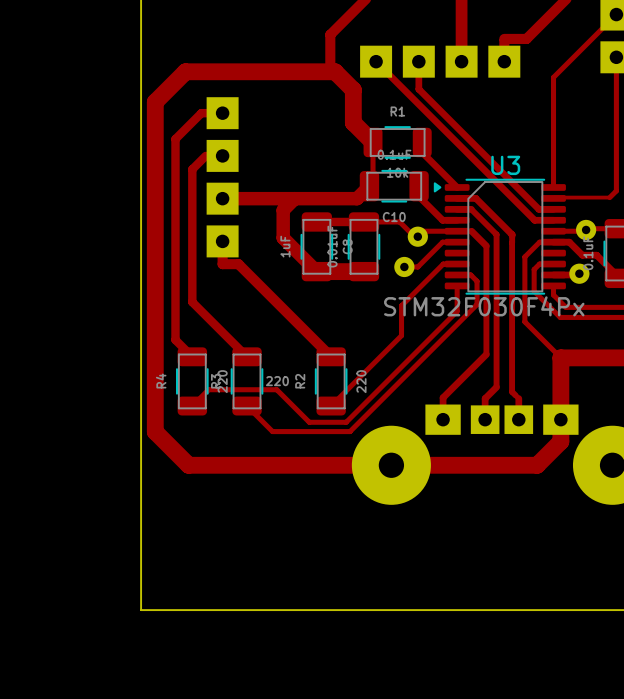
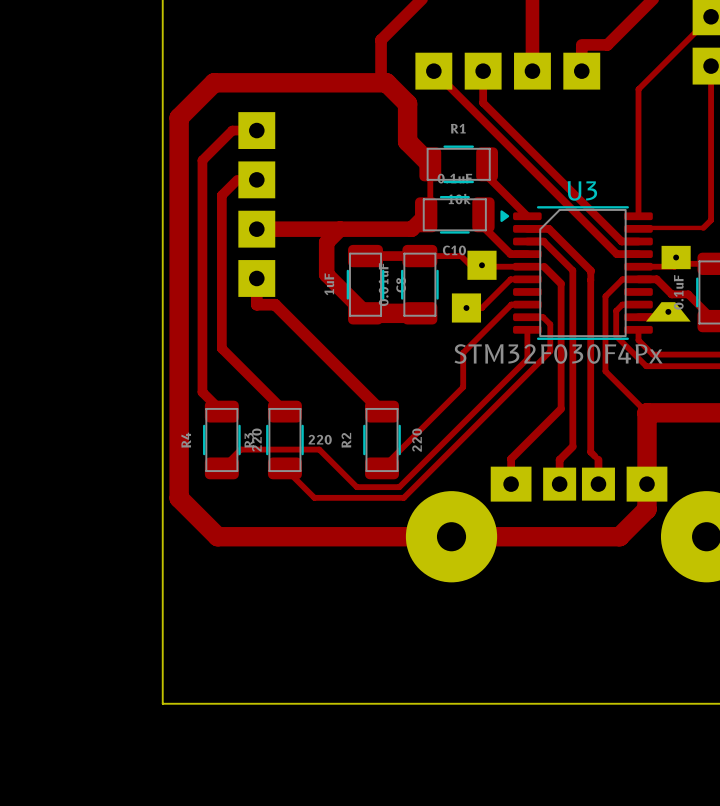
part footprint: [576, 219, 597, 241] -> [661, 245, 691, 270]
part footprint: [407, 226, 428, 247] -> [467, 250, 497, 280]
part footprint: [394, 256, 415, 278] -> [451, 293, 482, 323]
part footprint: [569, 263, 590, 284] -> [646, 302, 691, 322]

